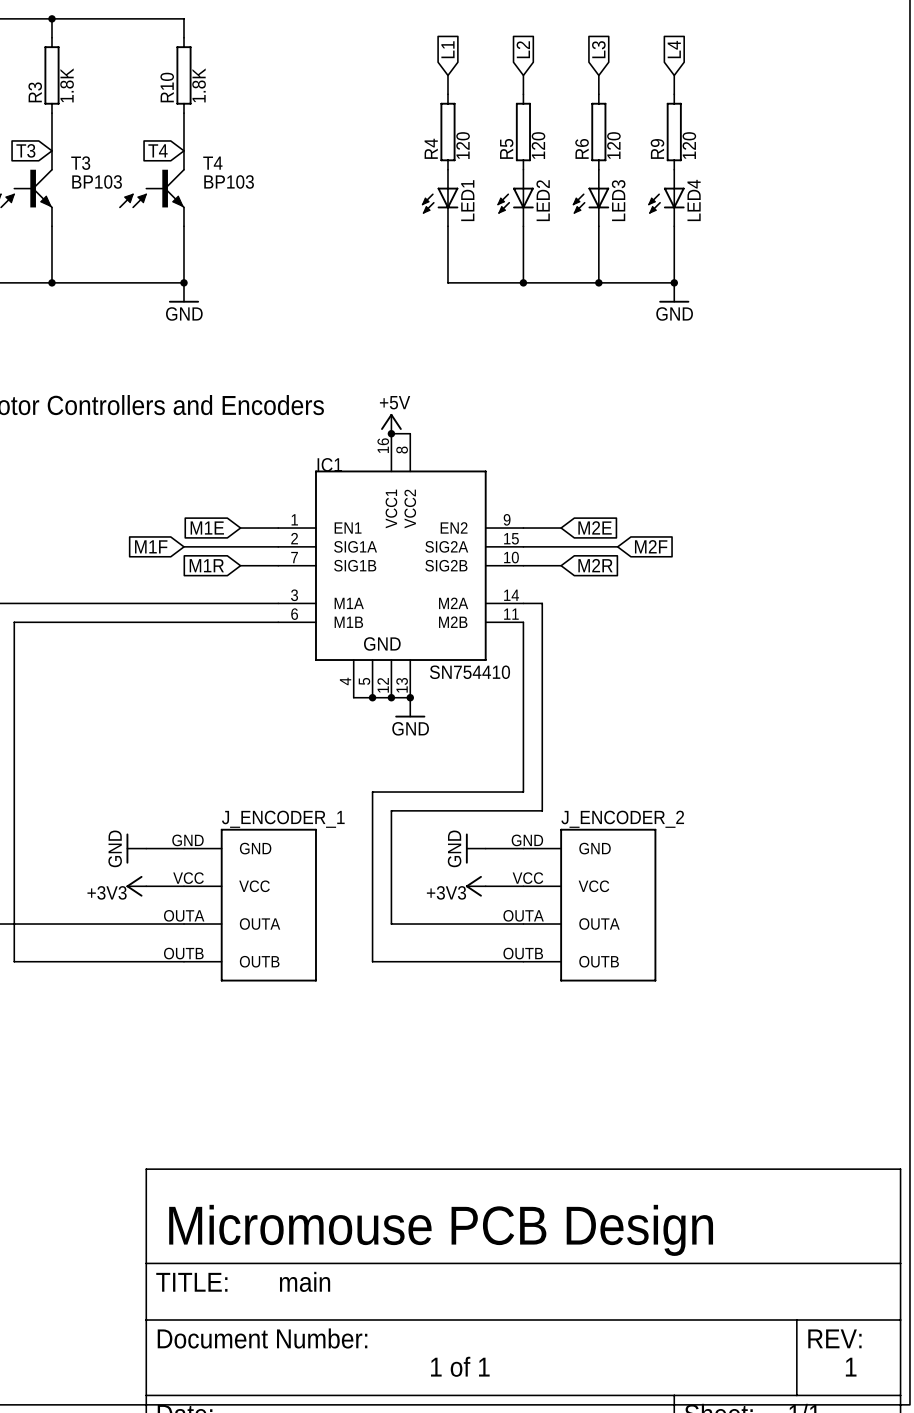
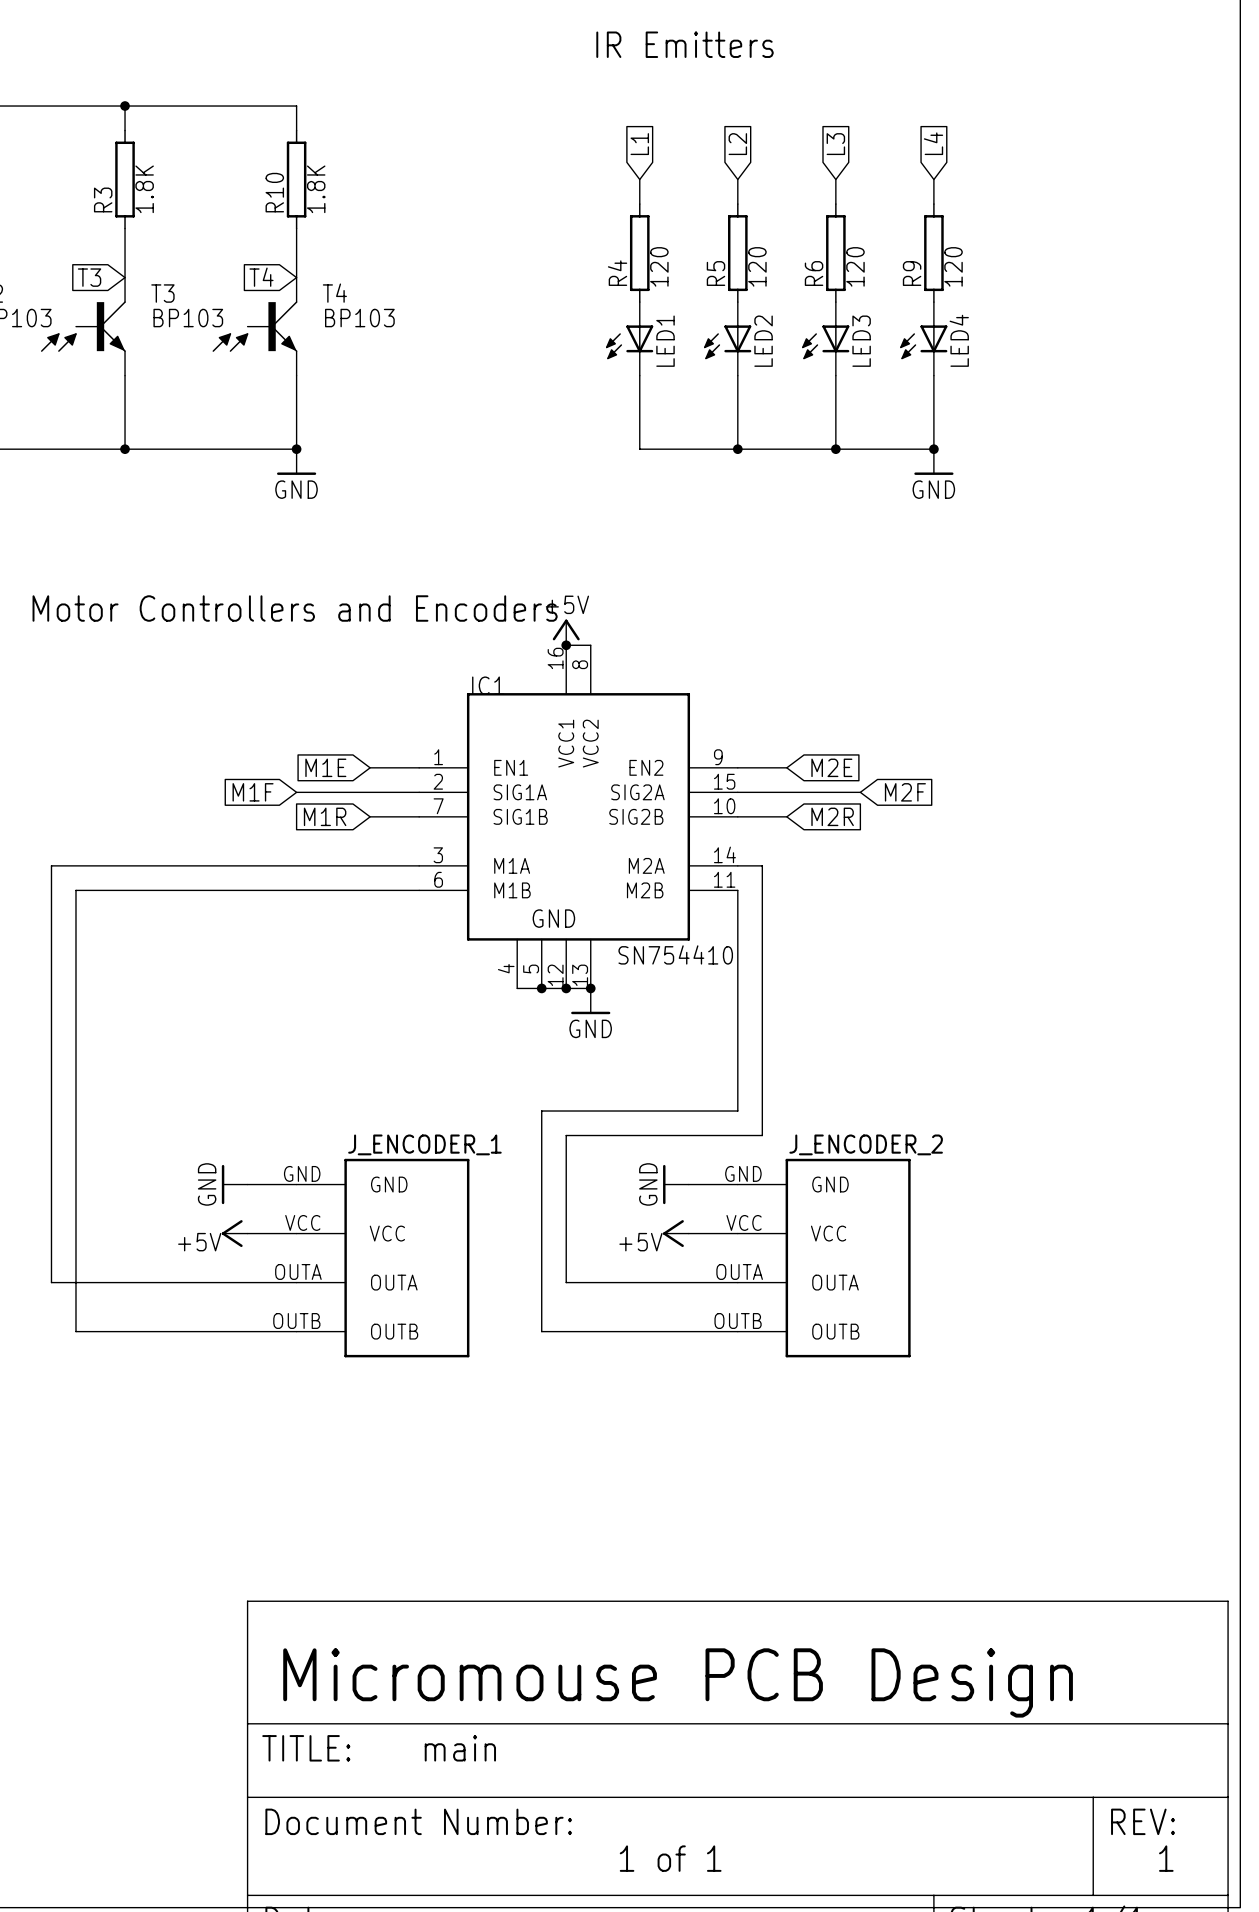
power symbol: +3V3 (136, 886) -> +5V (234, 1233)
power symbol: +3V3 (475, 886) -> +5V (675, 1233)

